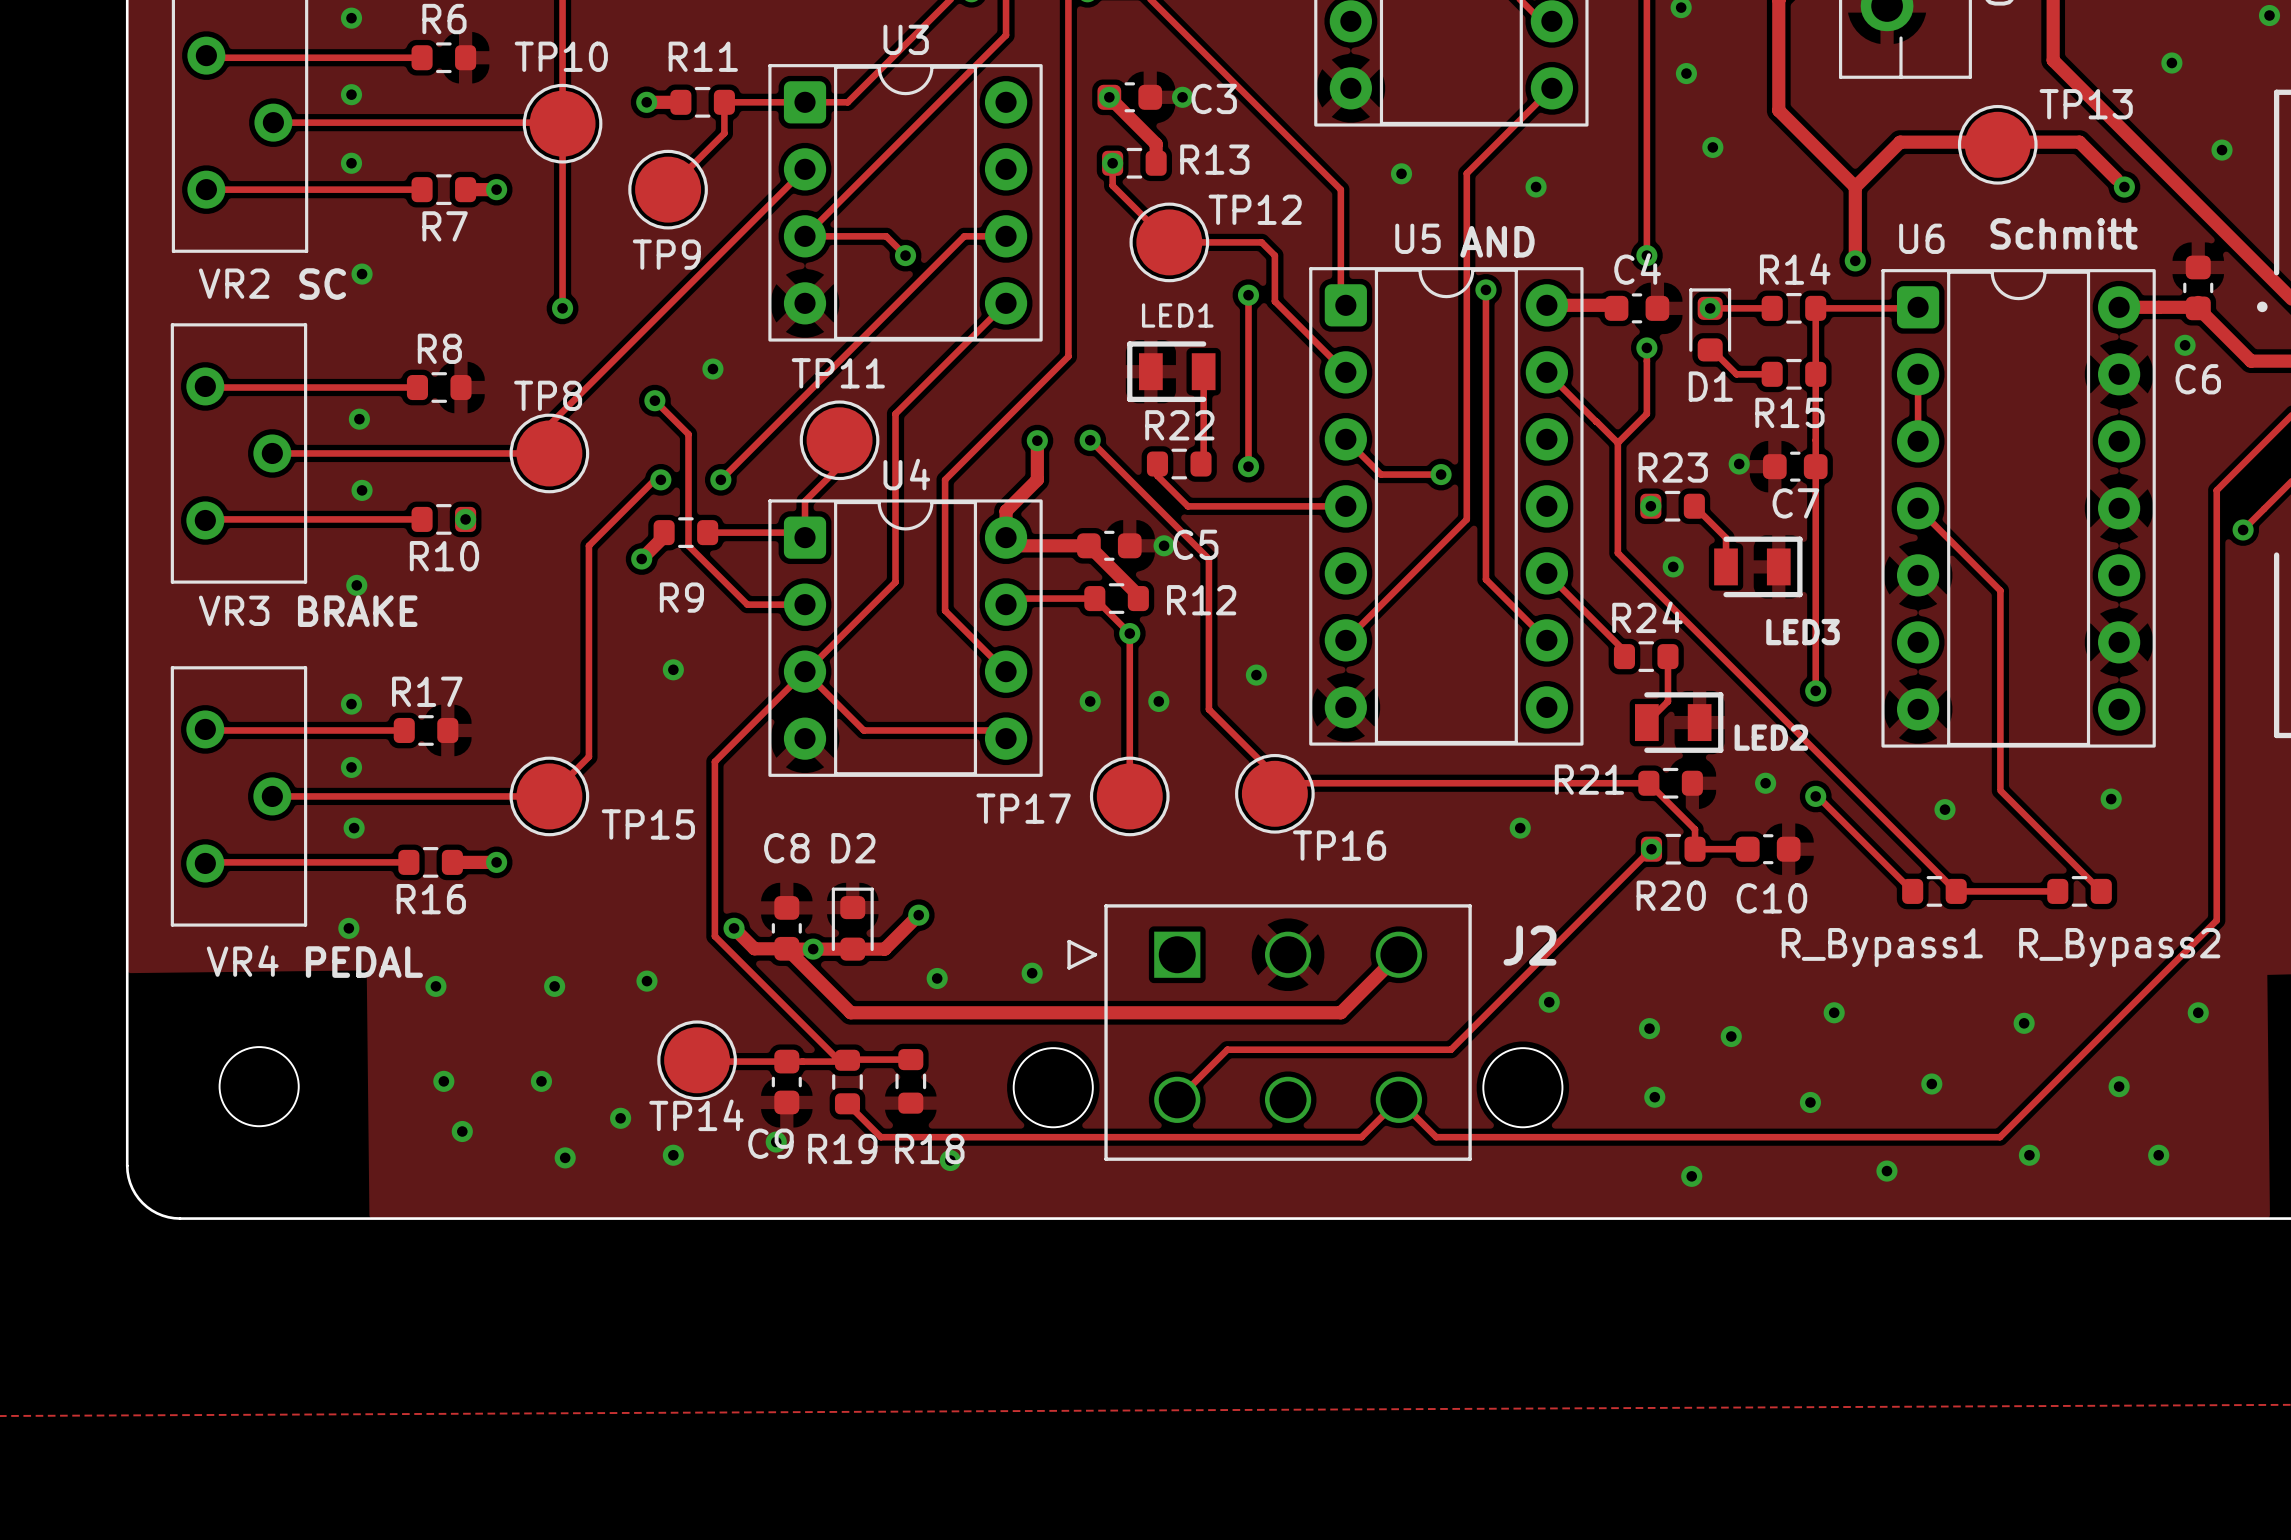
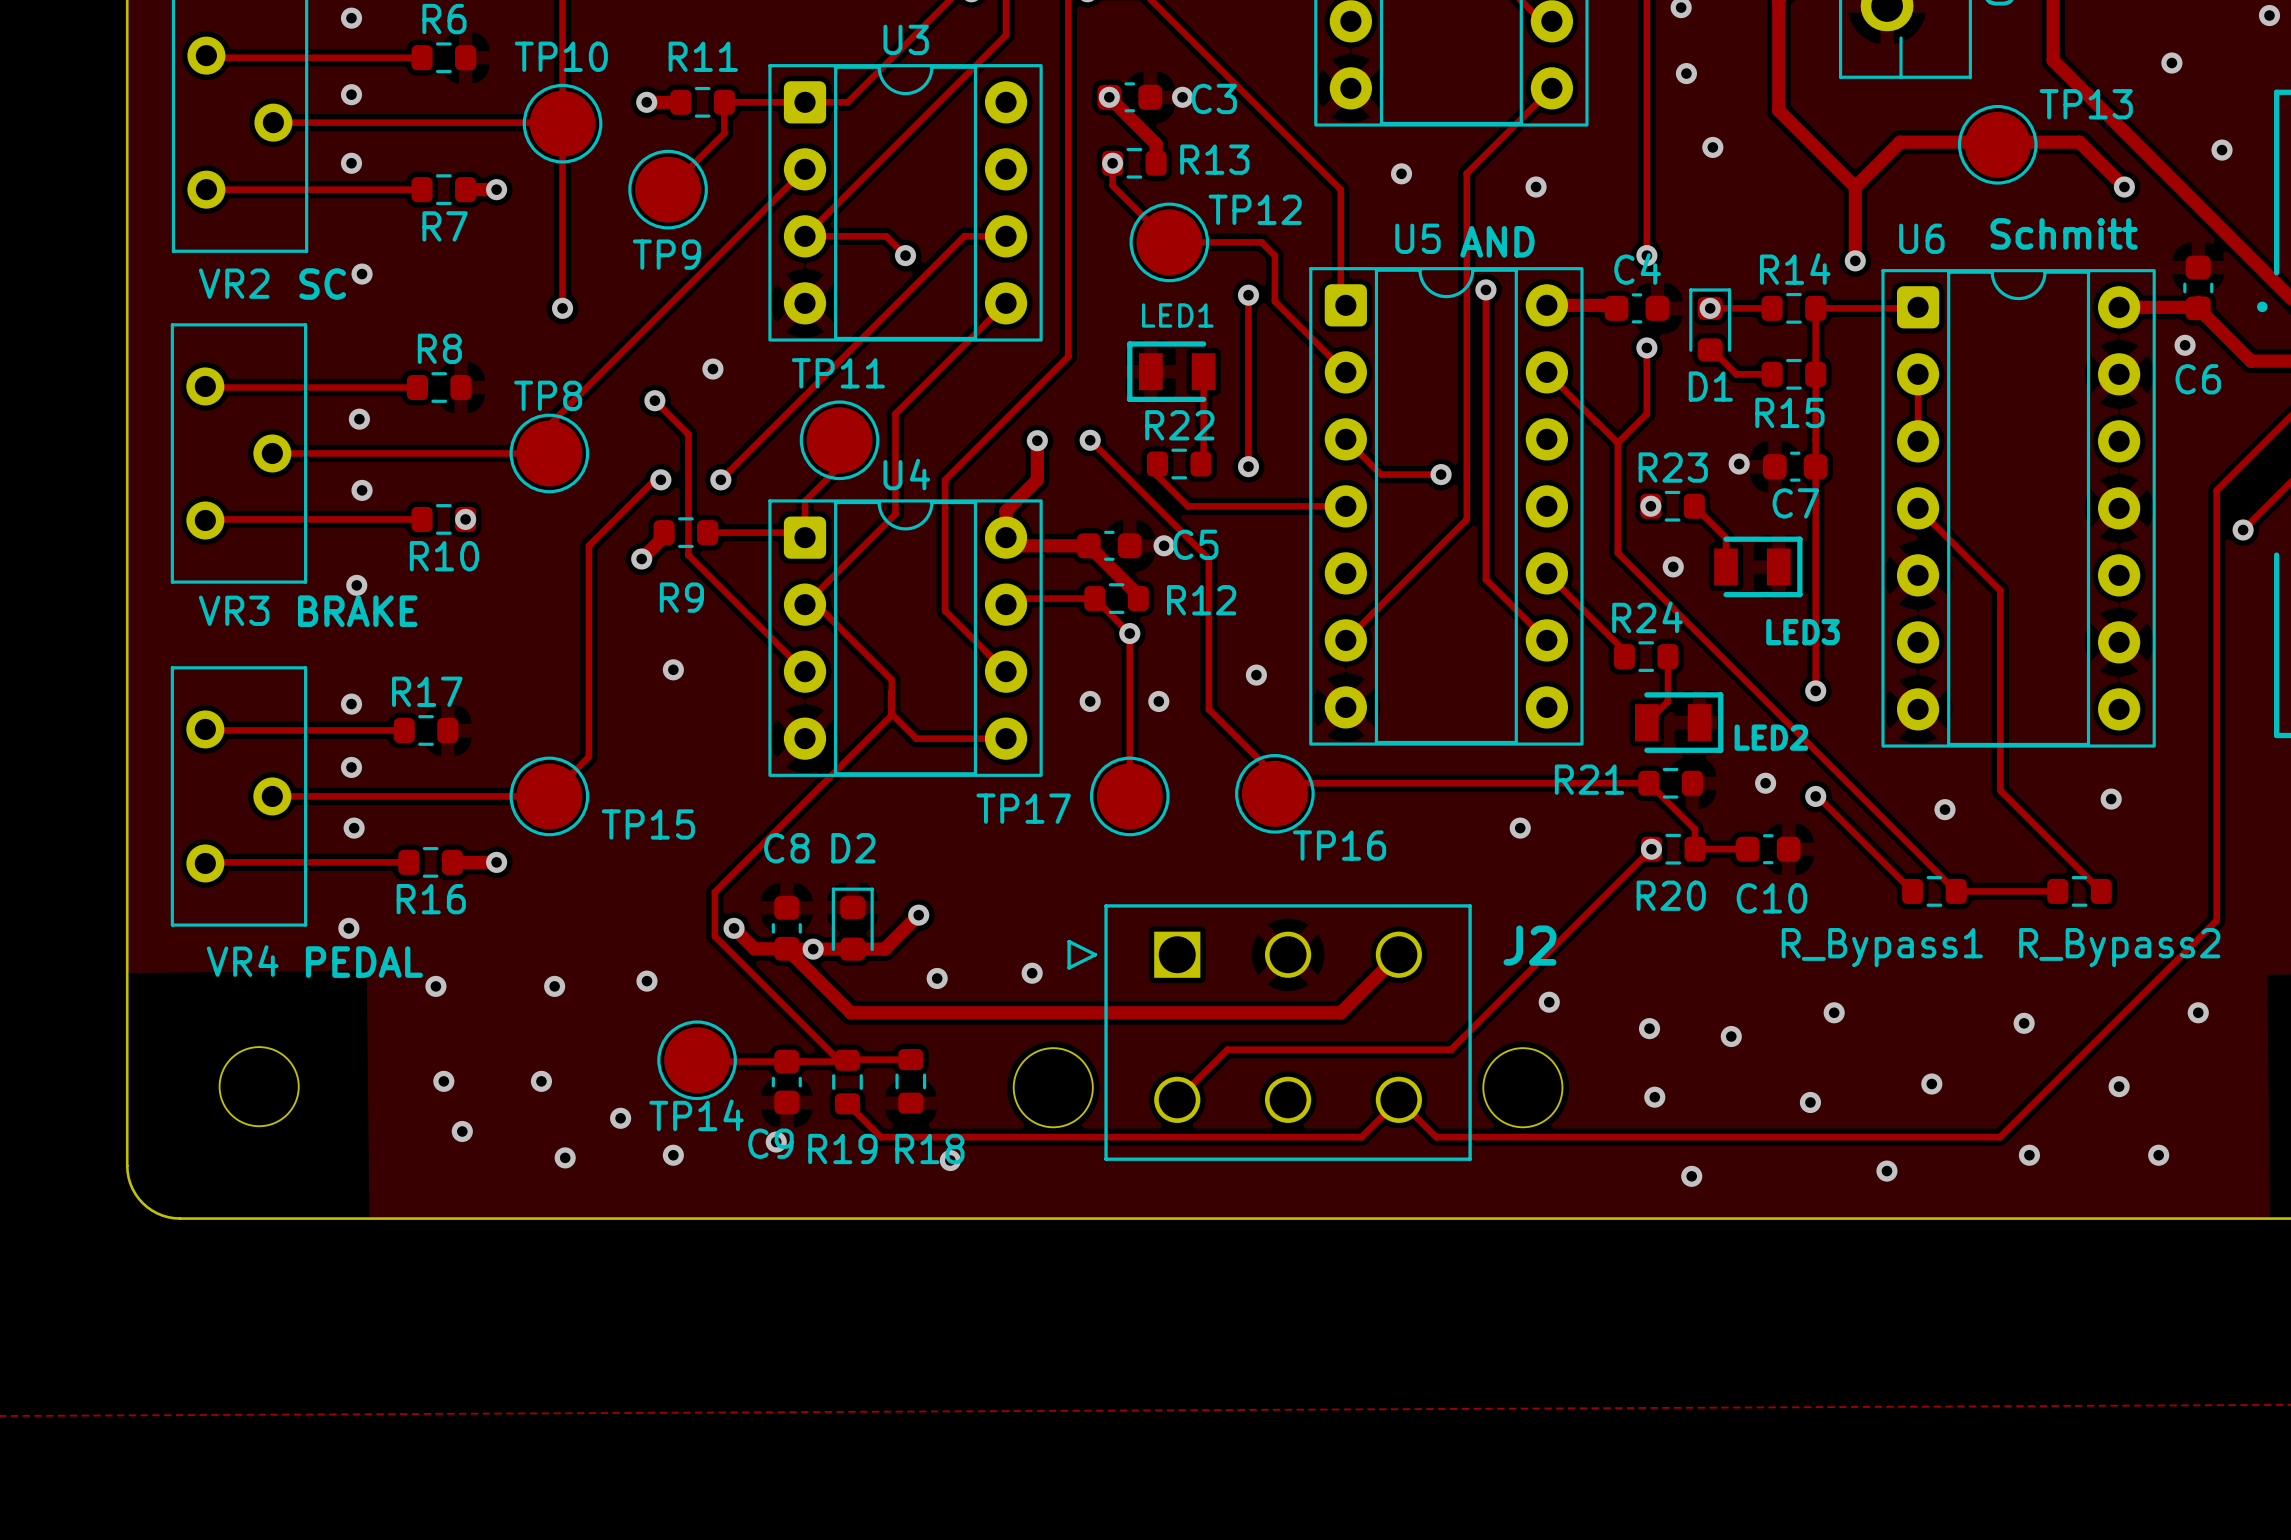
track: (895, 514) (895, 582) (805, 672) -> (895, 514) (805, 604) (816, 604) (891, 679) (891, 715) (714, 892)
track: (688, 545) (747, 604) (805, 604) -> (688, 545) (688, 555) (805, 671)
track: none -> (891, 714) (916, 738) (1006, 738)
track: (997, 730) (863, 730) (805, 671) (714, 761) (714, 892) -> none

